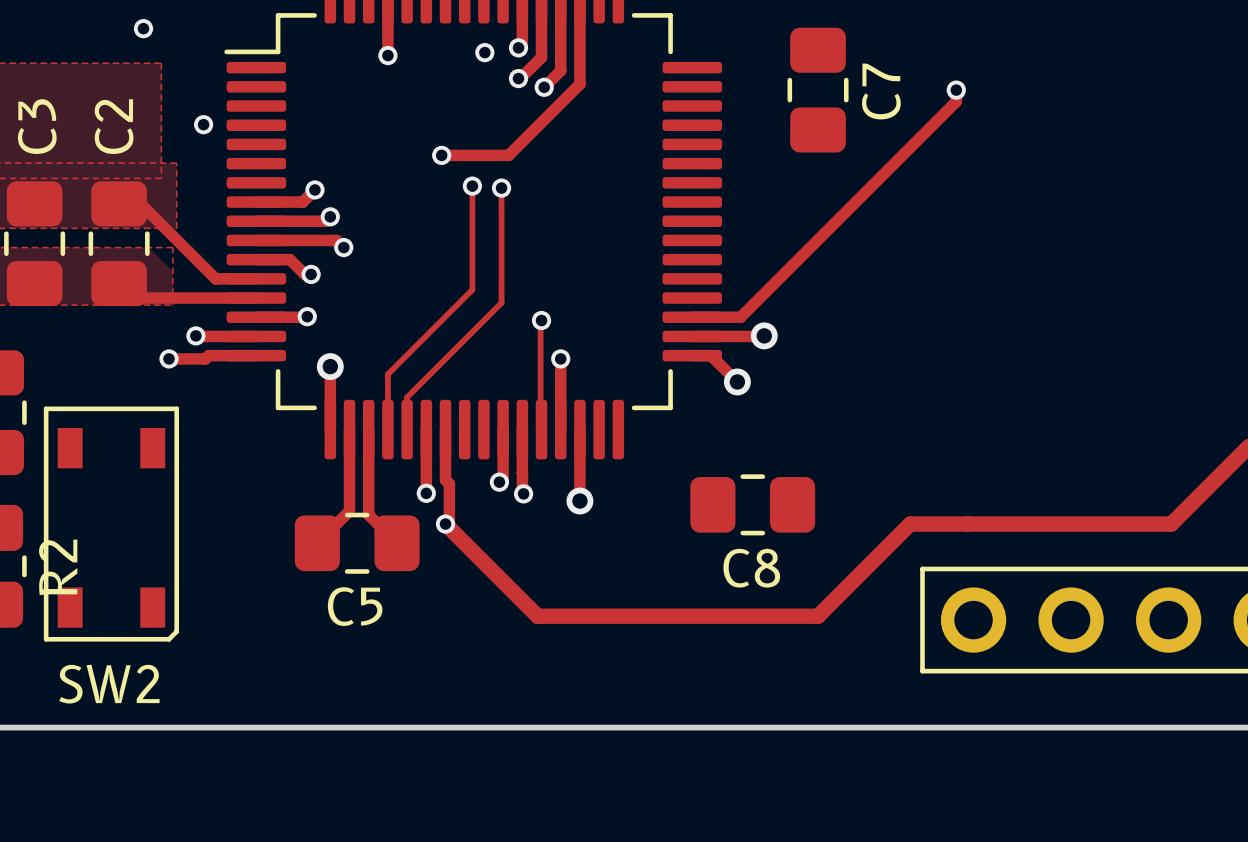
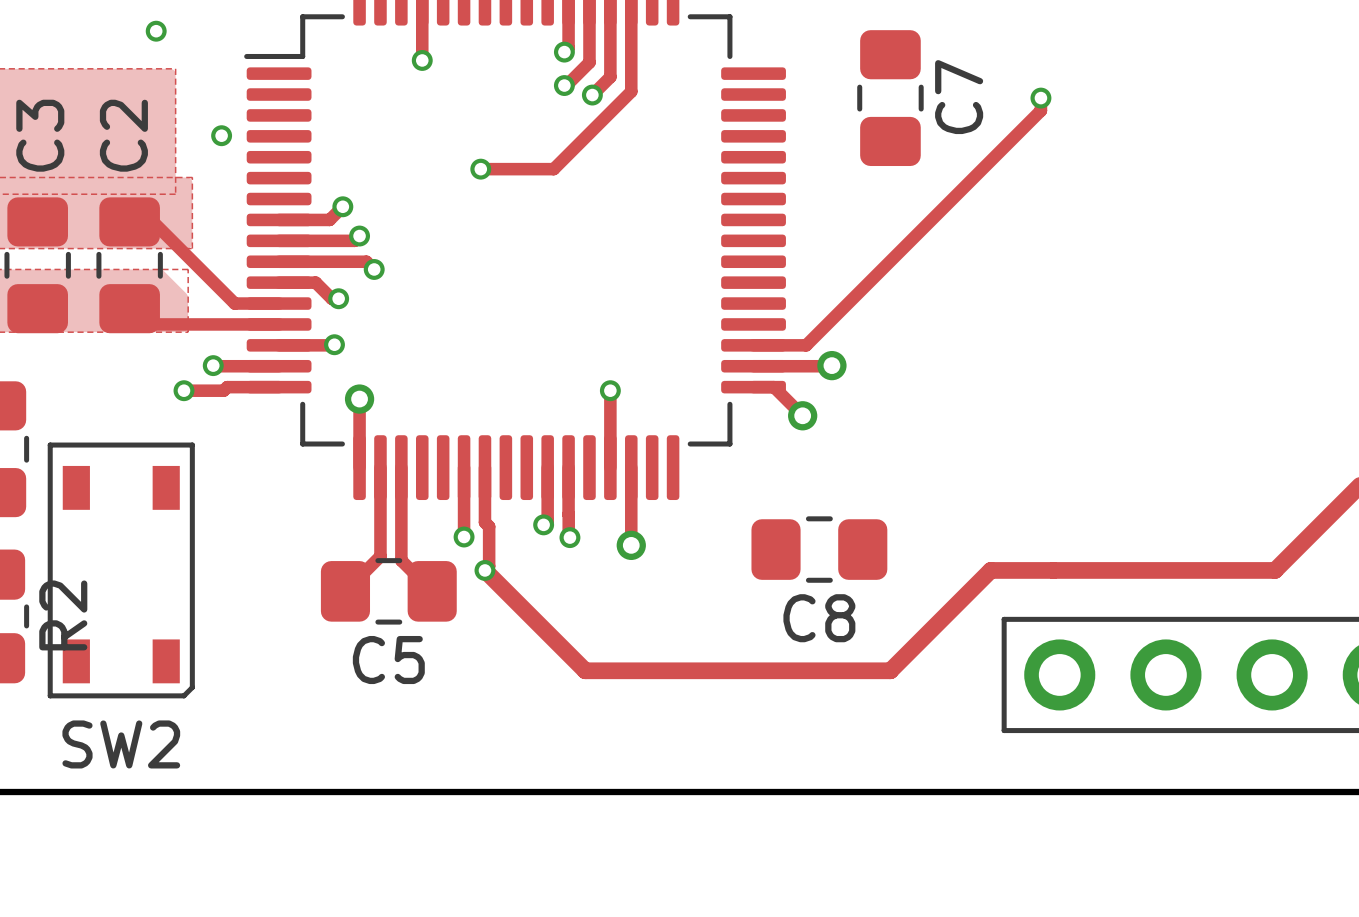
via: (484, 52) -> none
track: (472, 186) (472, 289) (387, 374) (387, 429) -> none
via: (472, 186) -> none
track: (501, 188) (501, 302) (407, 397) (407, 429) -> none
via: (501, 188) -> none
track: (541, 320) (541, 429) -> none
via: (541, 320) -> none

